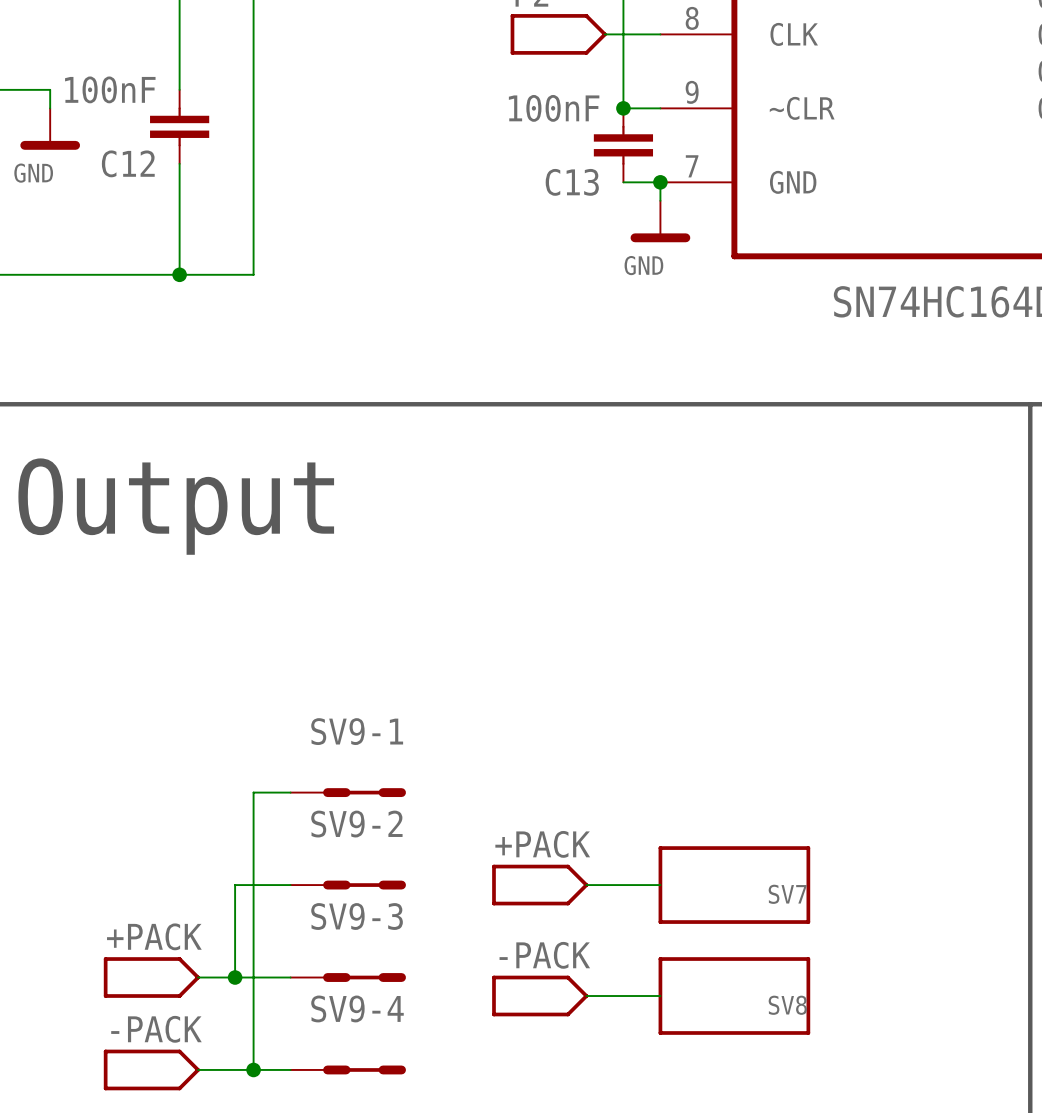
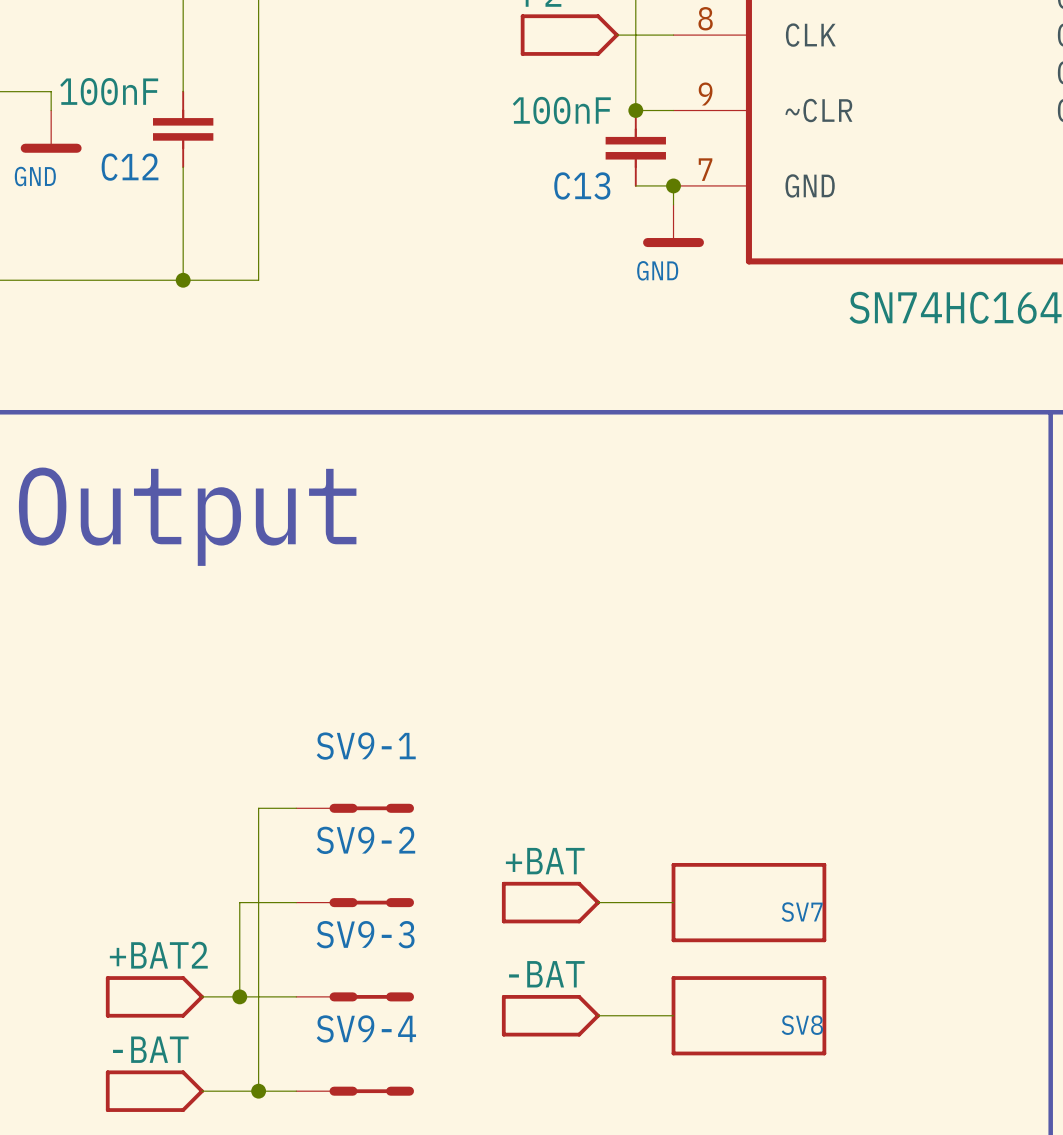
part value: +PACK (542, 844) -> +BAT (545, 861)
part value: +PACK (154, 936) -> +BAT2 (158, 955)
part value: -PACK (544, 955) -> -BAT (546, 974)
part value: -PACK (156, 1029) -> -BAT (150, 1049)

